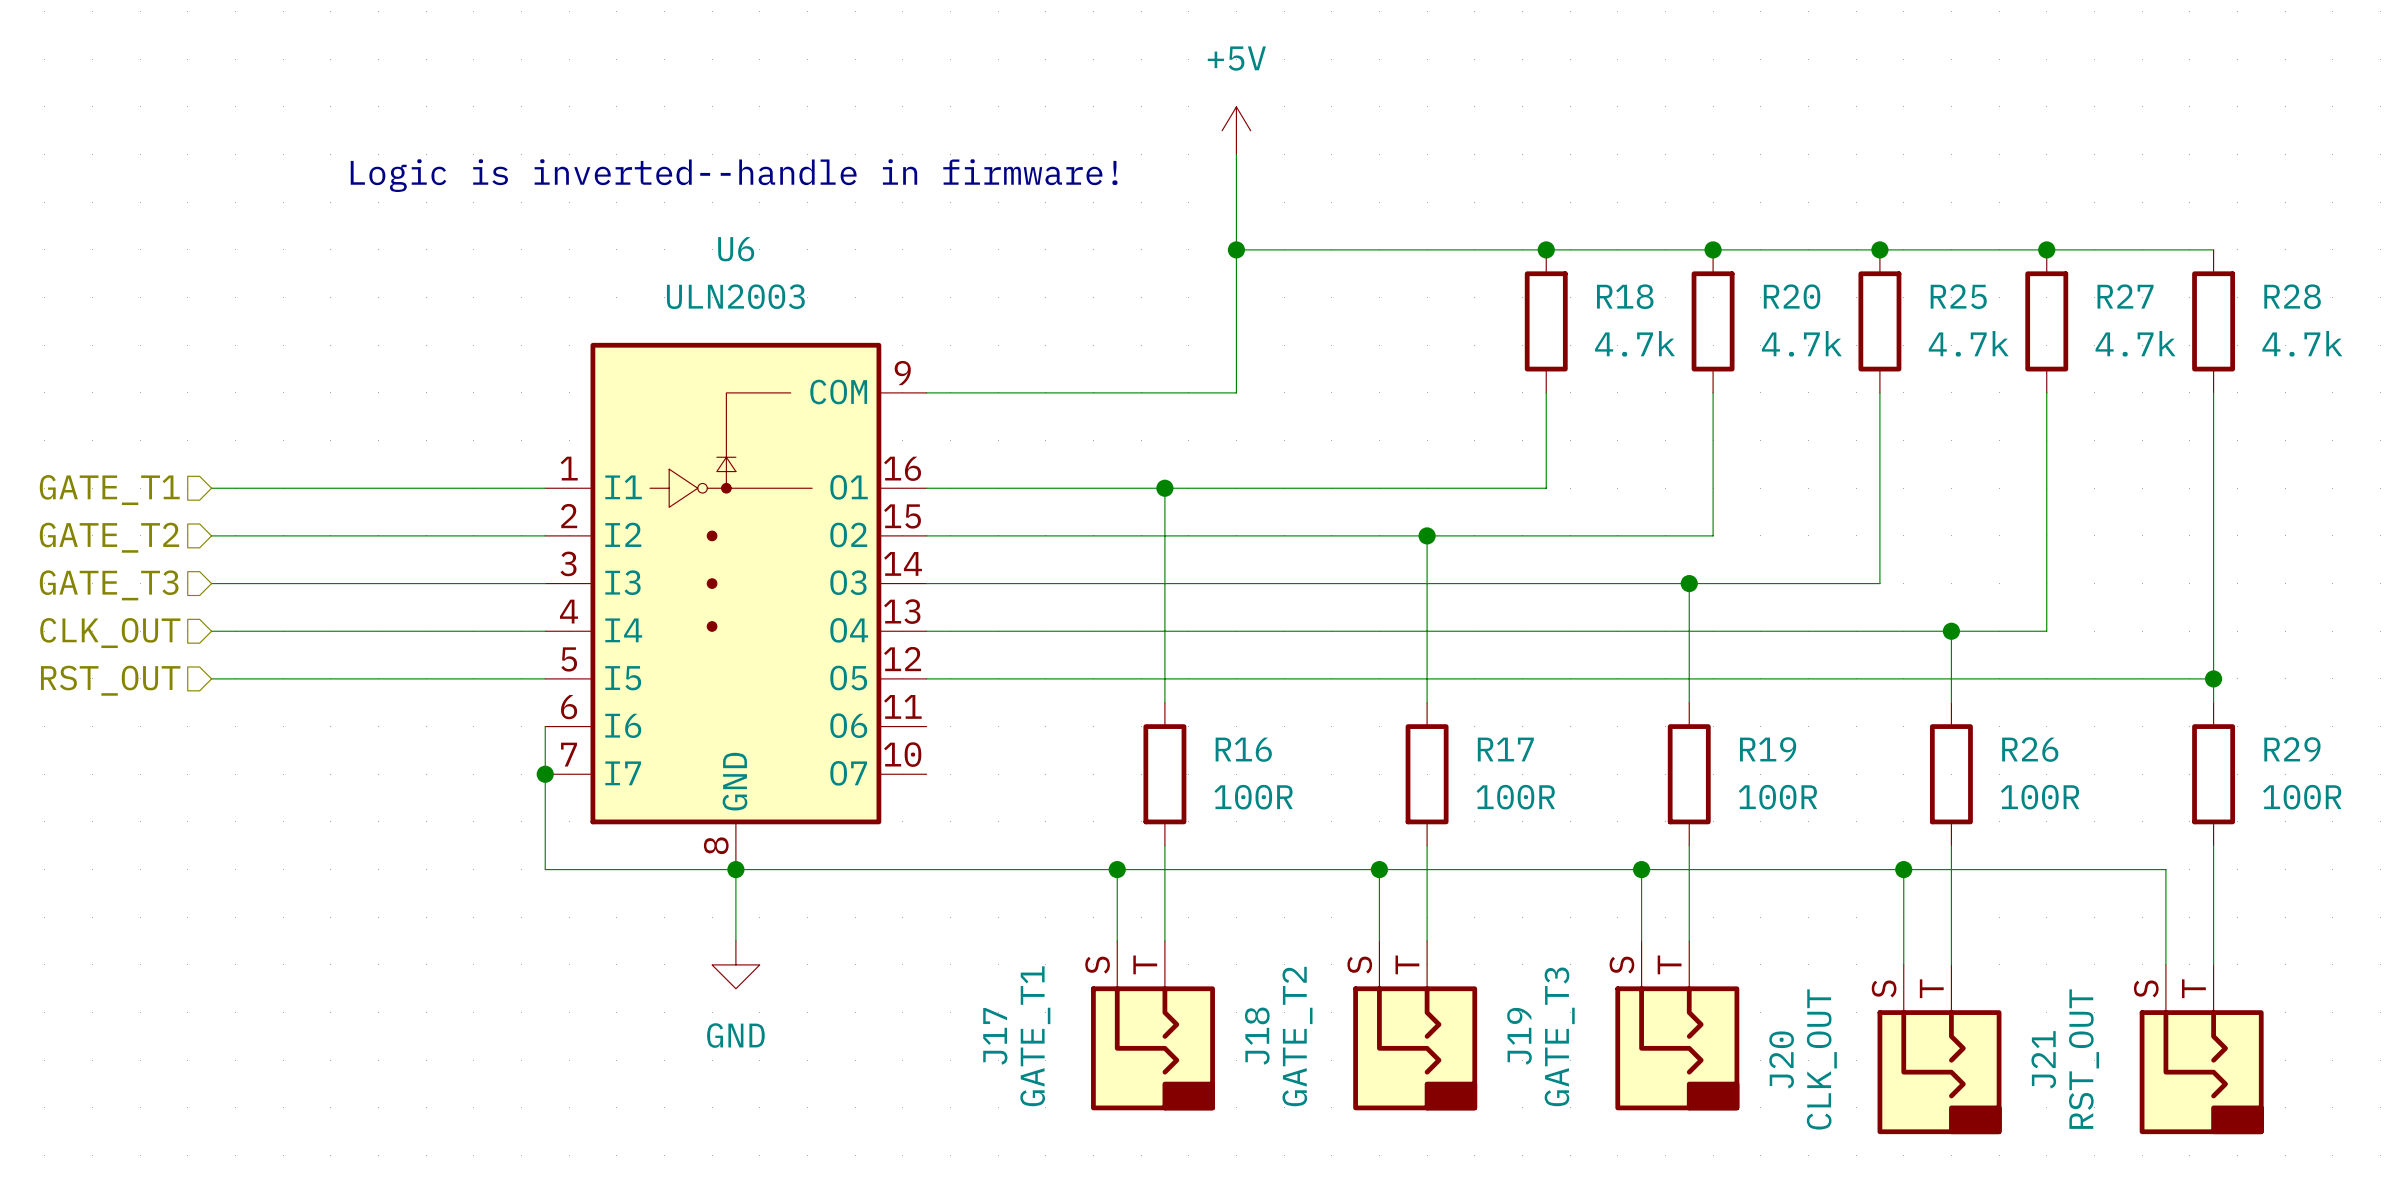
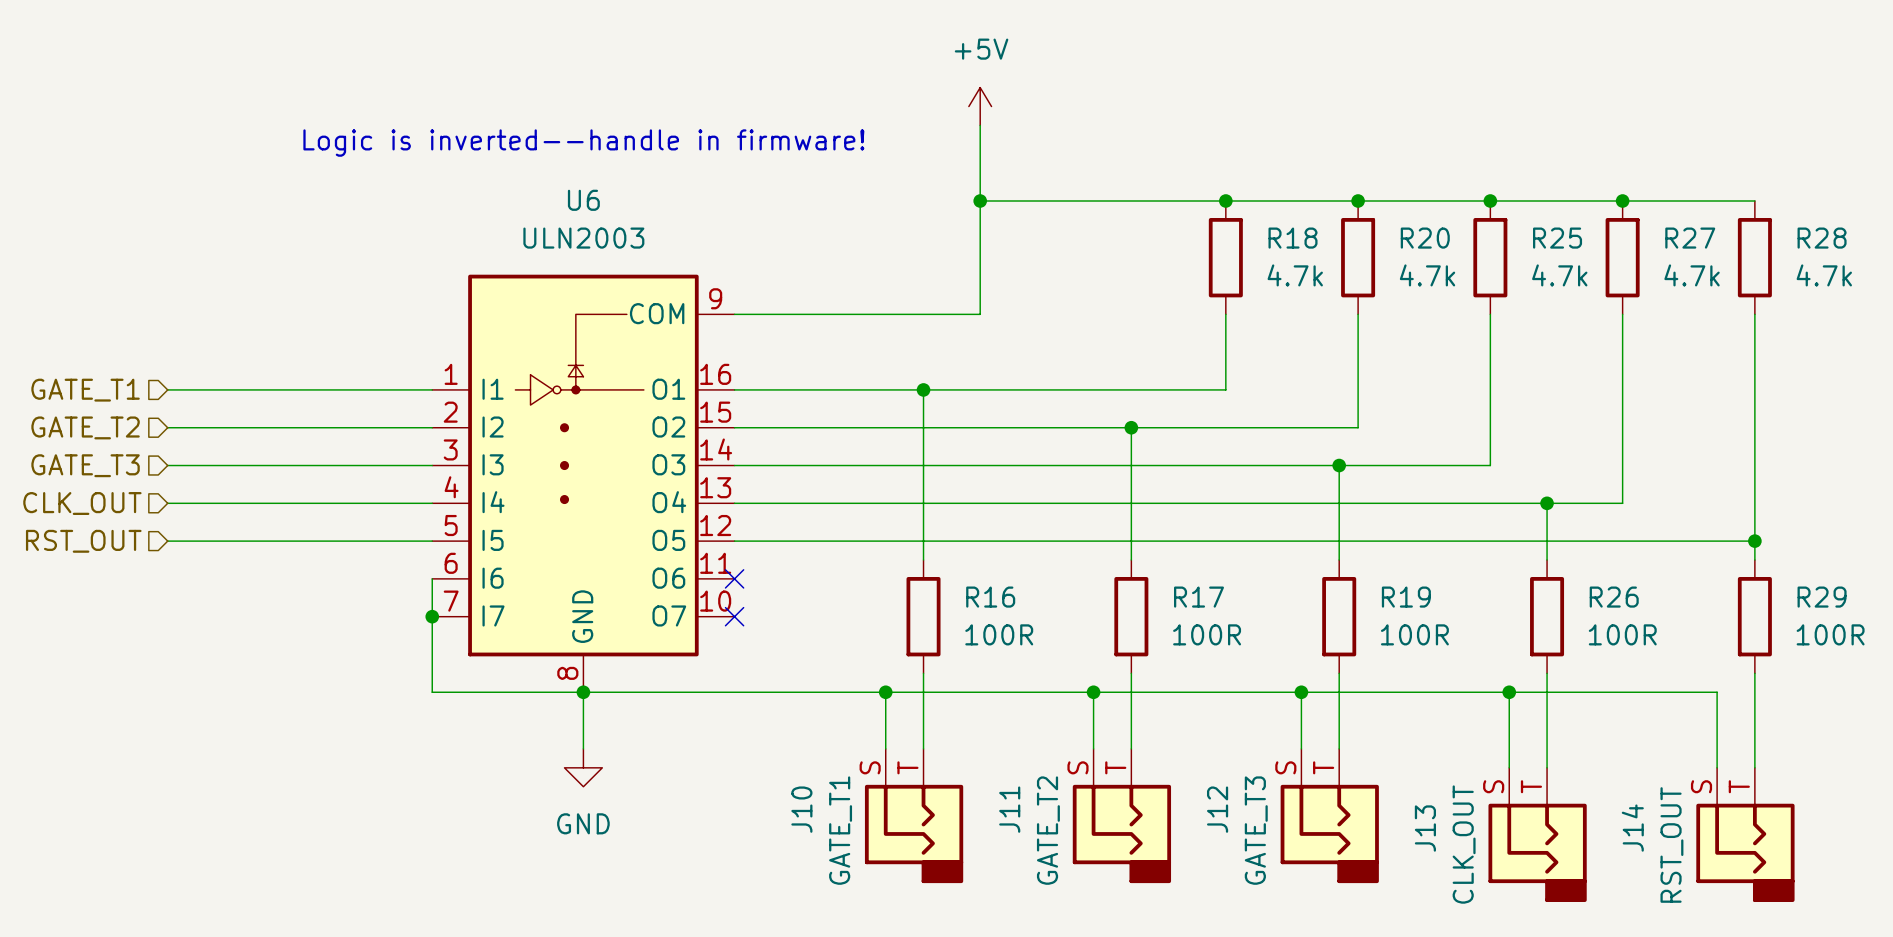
no-connect mark: none -> (734, 578)
no-connect mark: none -> (734, 616)
J17: GATE_T1 (1152, 1025) -> none
J10: none -> GATE_T1 (914, 816)
J18: GATE_T2 (1415, 1025) -> none
J11: none -> GATE_T2 (1121, 816)
J19: GATE_T3 (1677, 1025) -> none
J12: none -> GATE_T3 (1329, 816)
J20: CLK_OUT (1939, 1049) -> none
J13: none -> CLK_OUT (1537, 834)
J21: RST_OUT (2201, 1049) -> none
J14: none -> RST_OUT (1745, 834)

